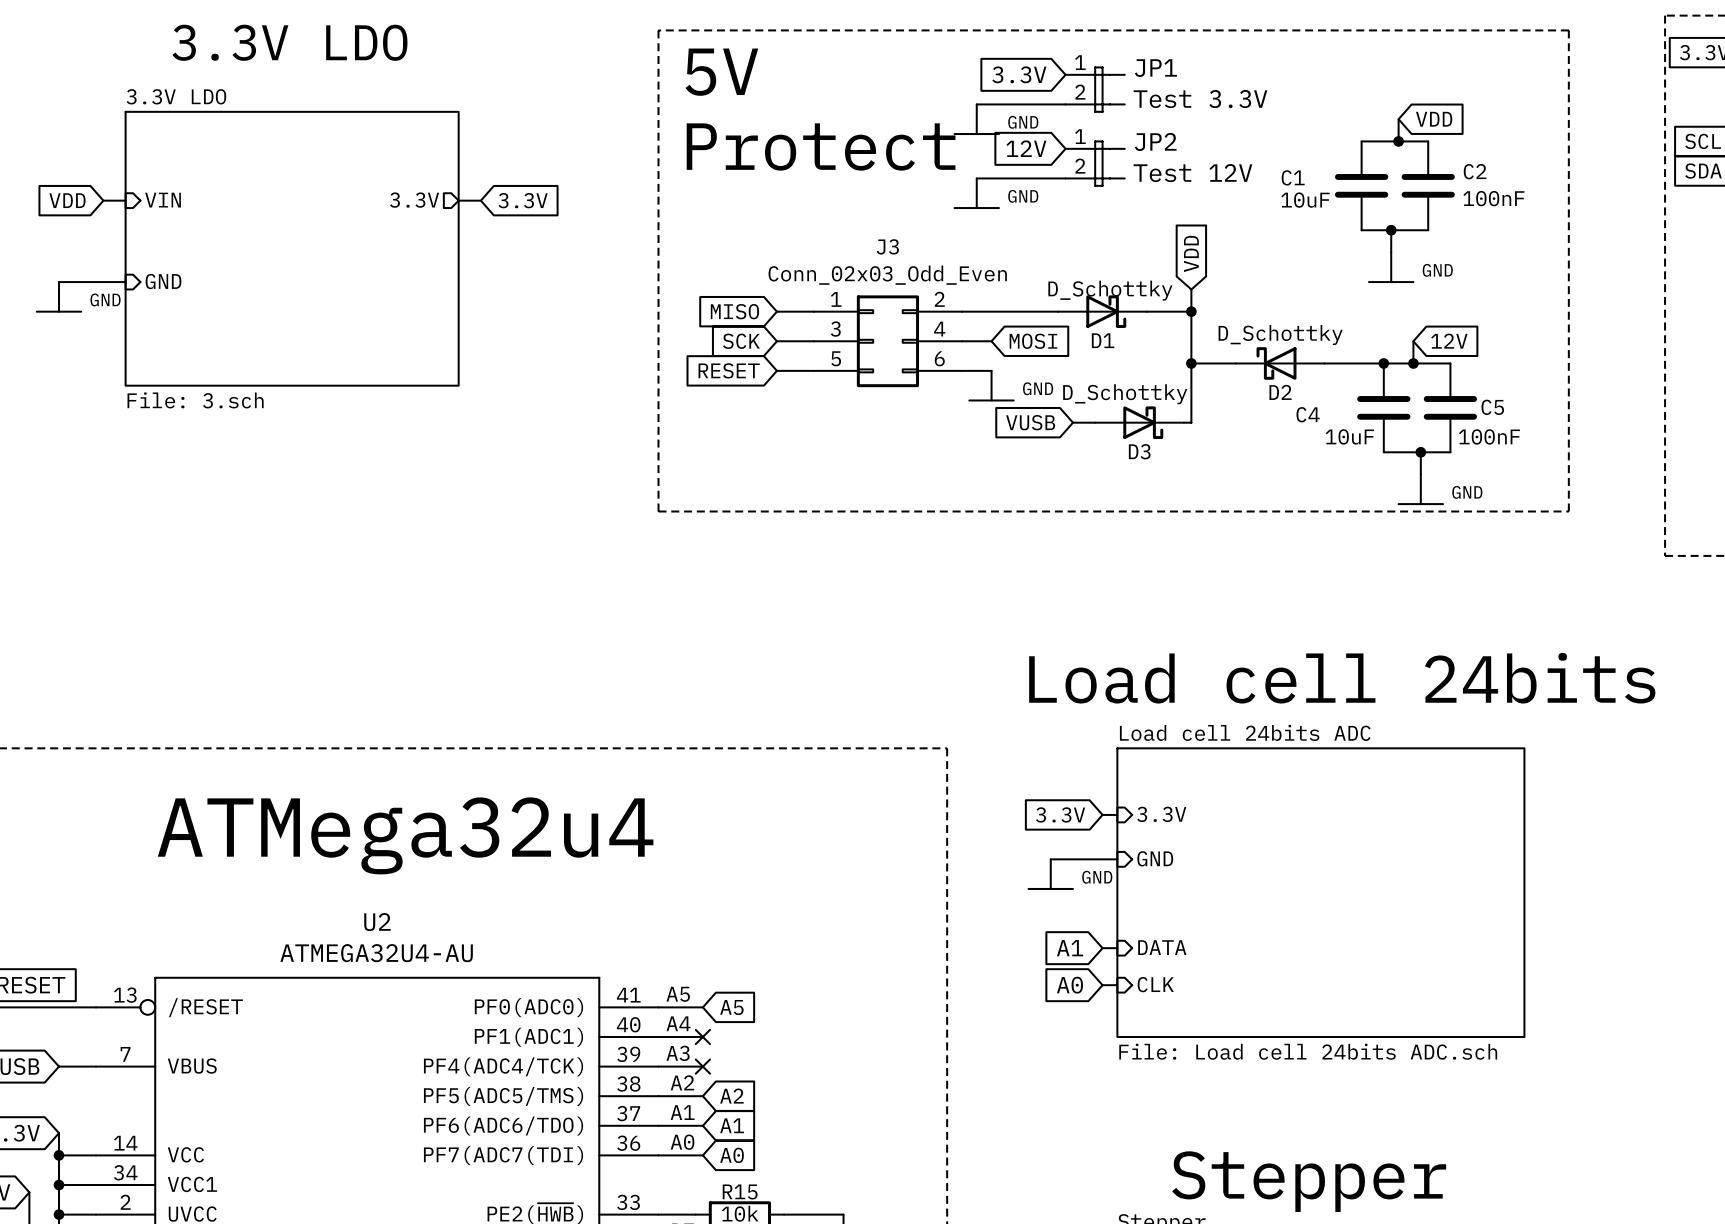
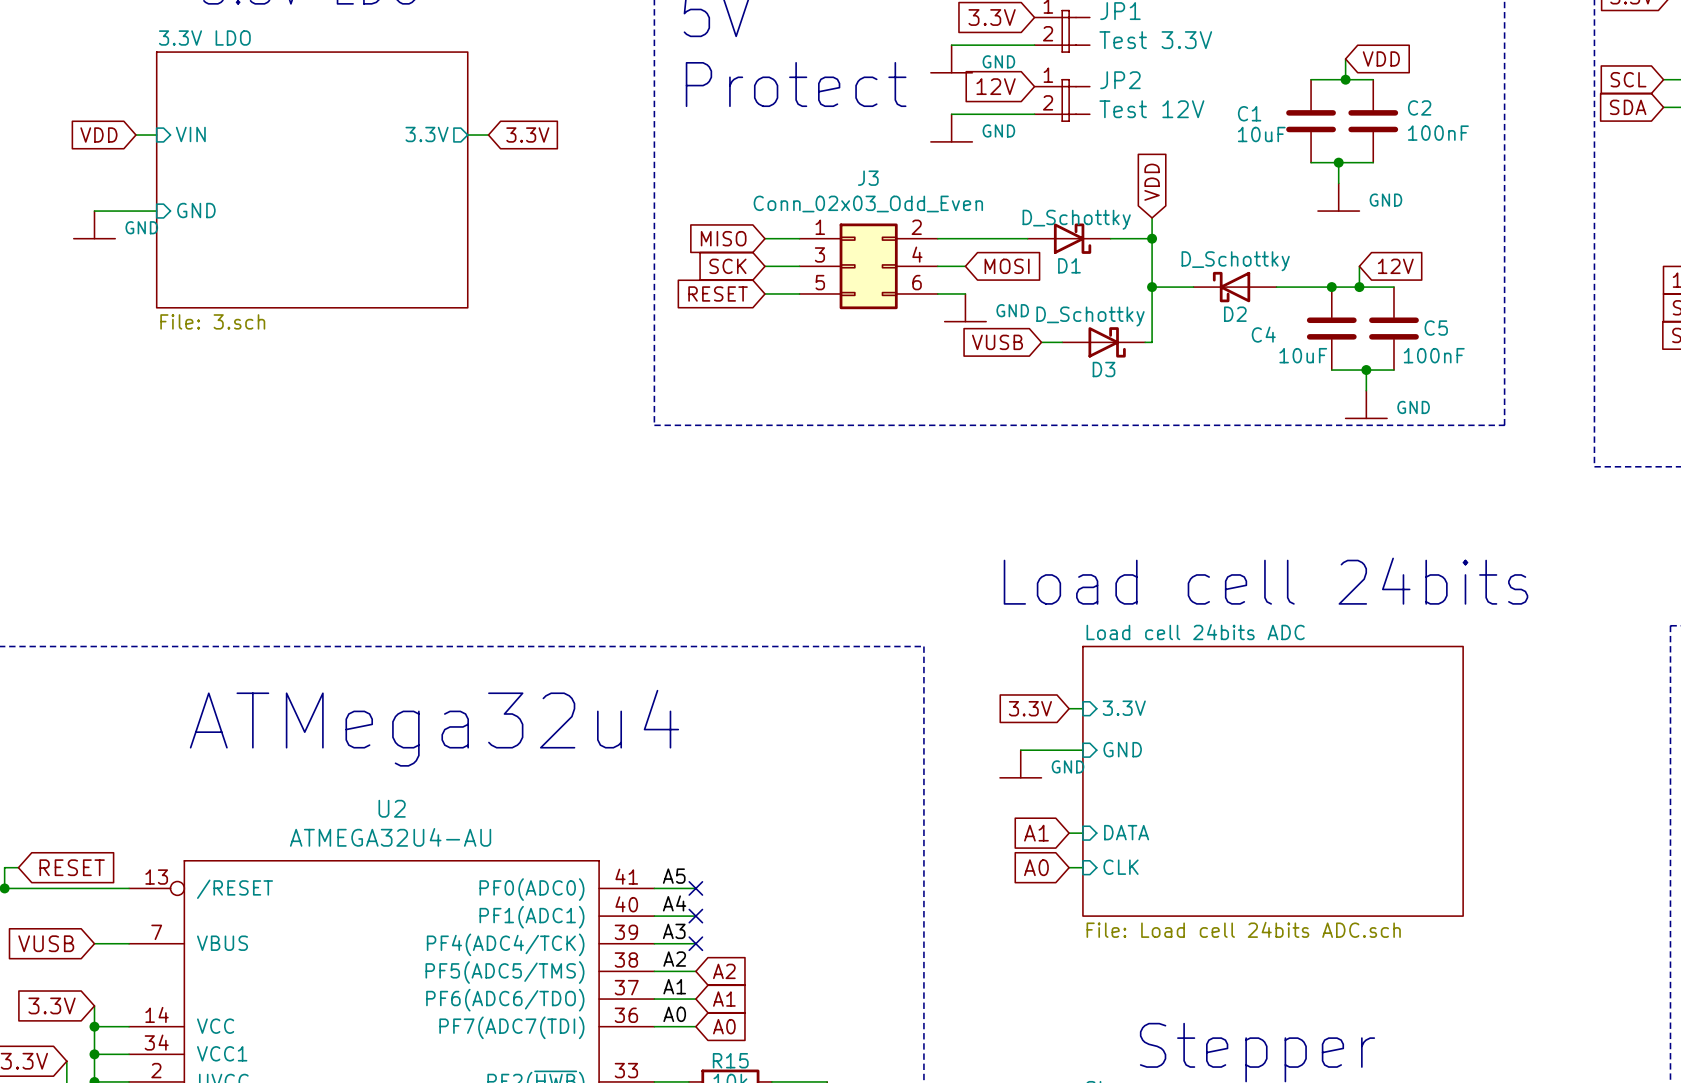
no-connect mark: none -> (695, 888)
global label: A5 (731, 1007) -> none

